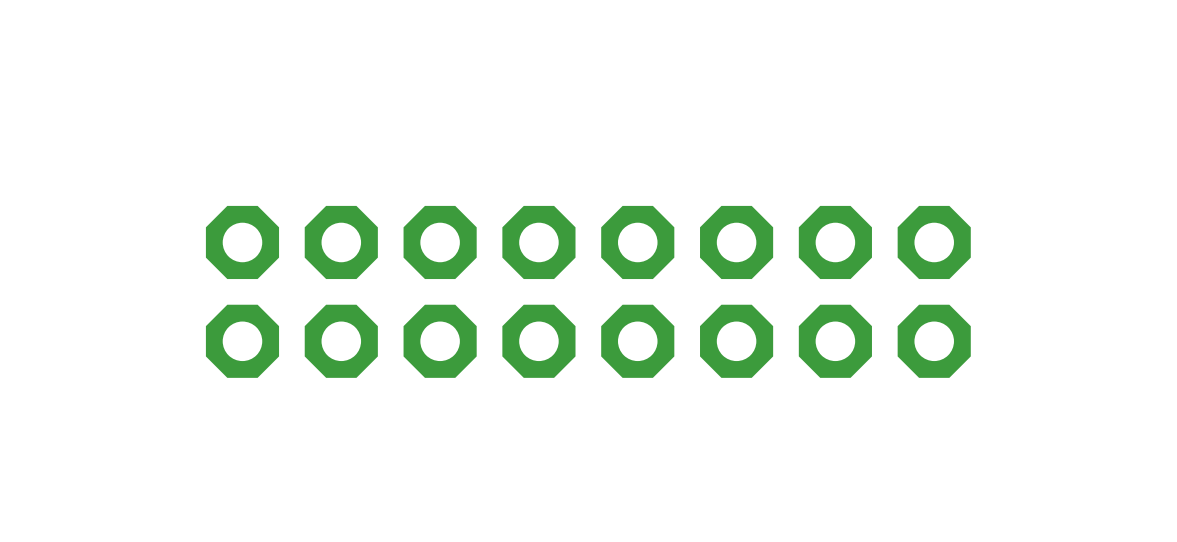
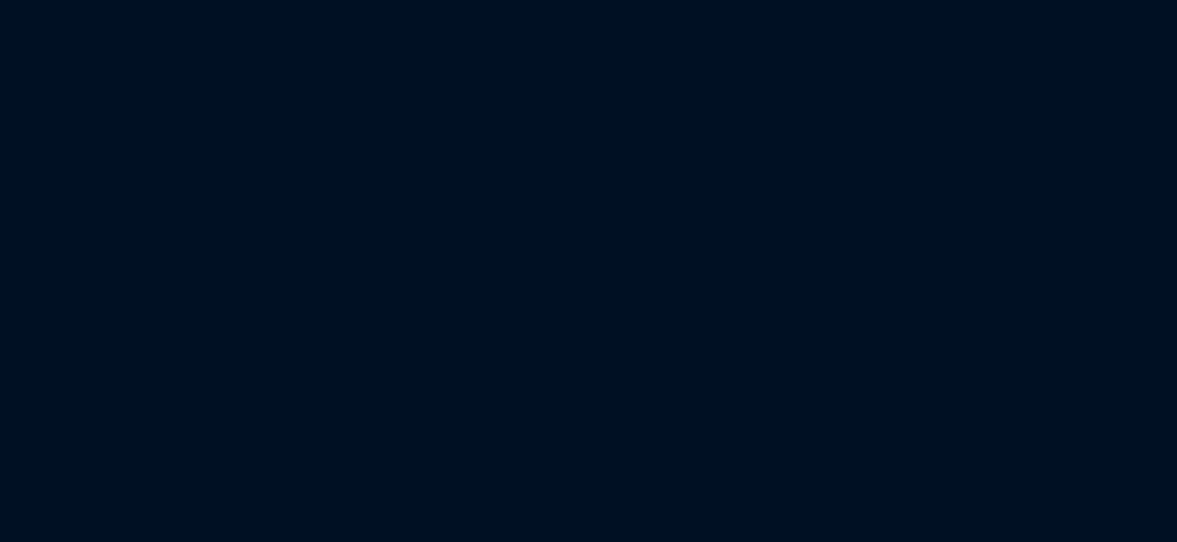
part: (588, 291) -> none

